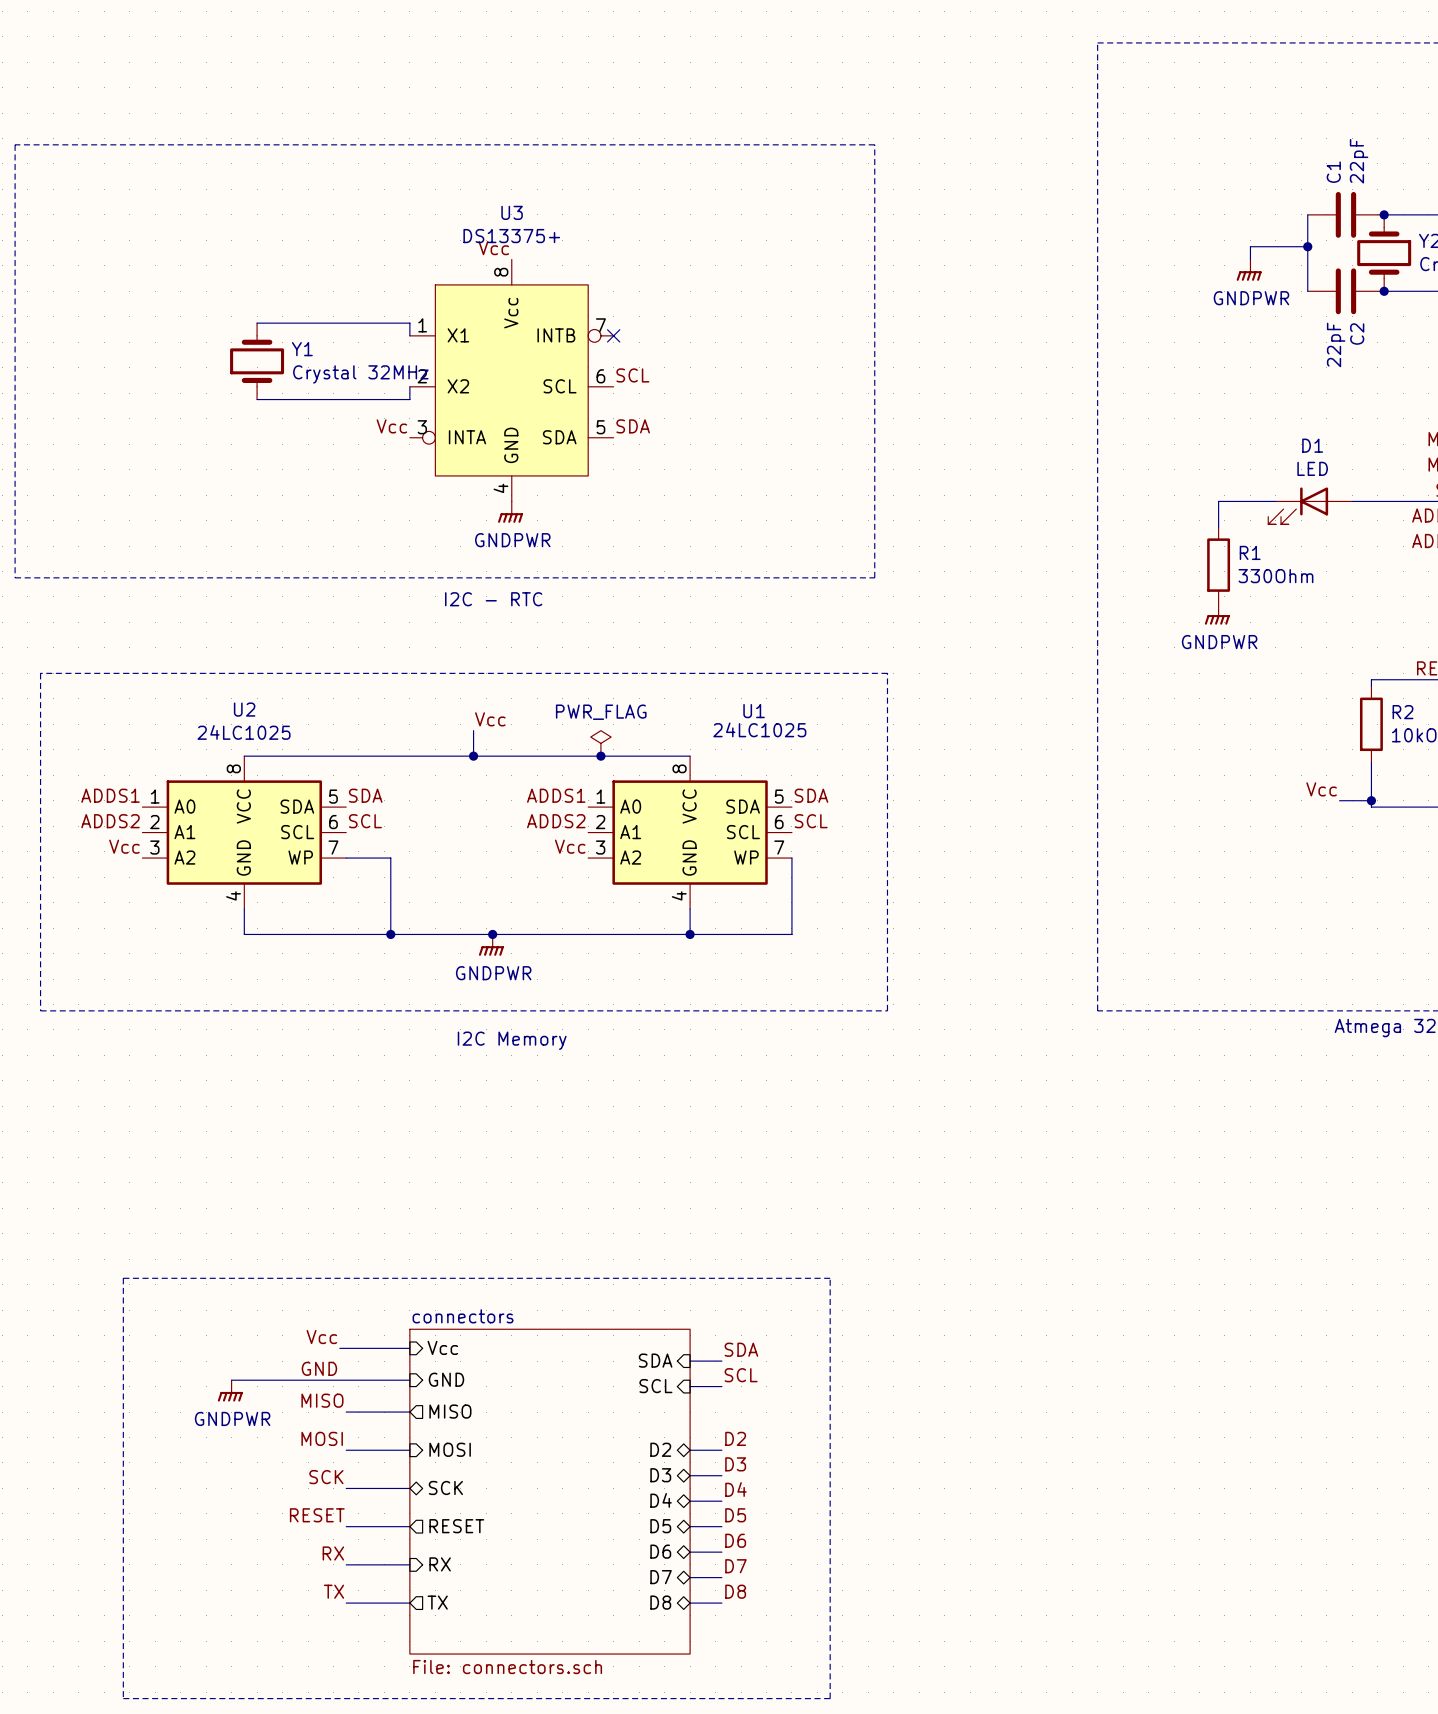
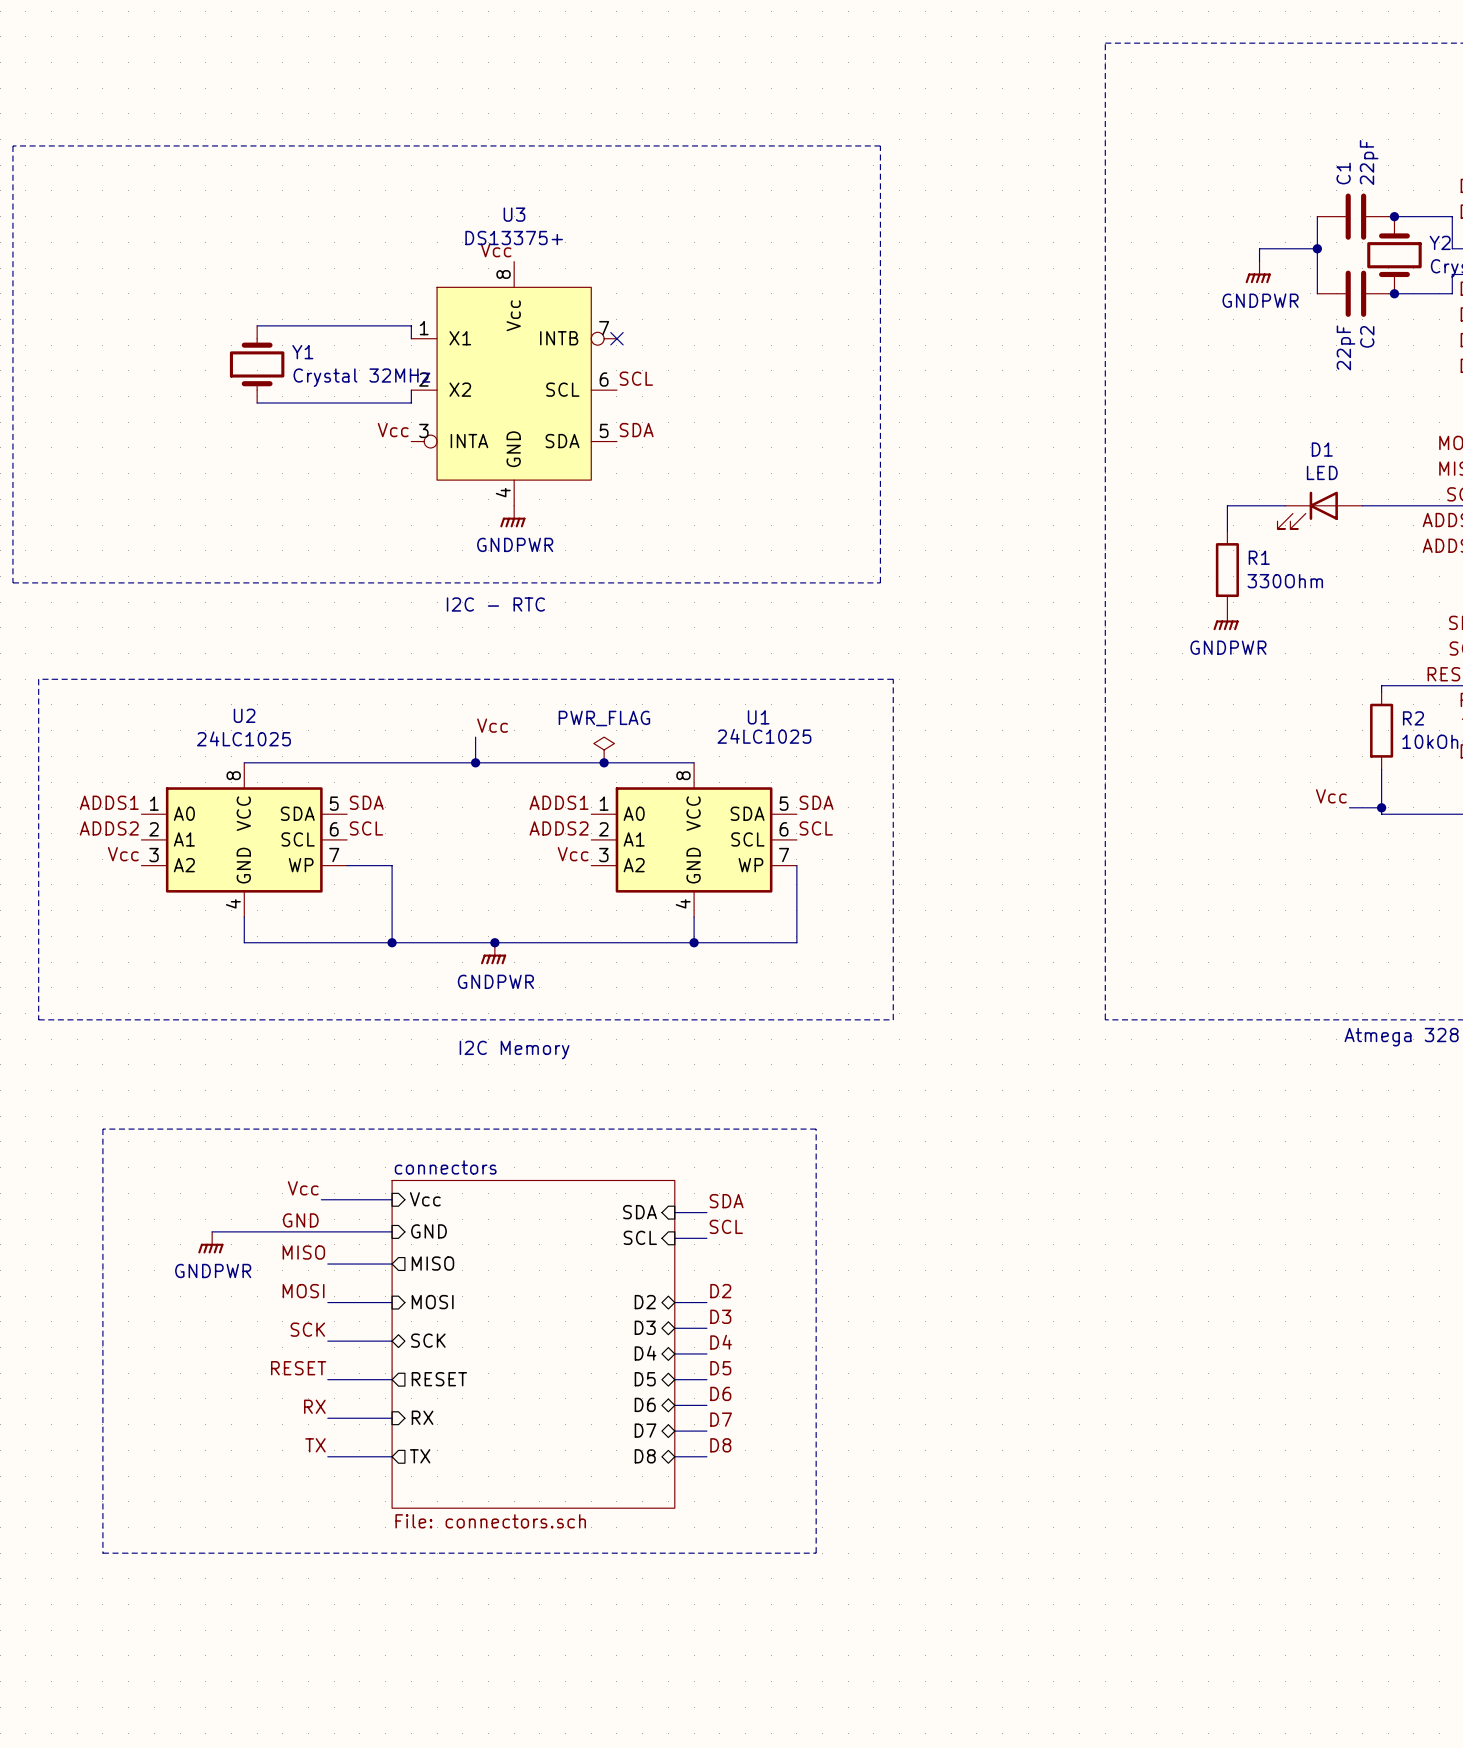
line: (123, 1278) (123, 1698) (830, 1698) (830, 1278) (123, 1278) -> (102, 1129) (102, 1553) (816, 1553) (816, 1129) (102, 1129)
label position: Vcc (321, 1336) -> Vcc (303, 1188)
sheet pin position: Vcc (442, 1347) -> Vcc (425, 1199)
wire: (339, 1348) (409, 1348) -> (321, 1199) (392, 1199)
label position: SDA (741, 1349) -> SDA (726, 1201)
sheet pin position: SDA (655, 1360) -> SDA (640, 1212)
wire: (690, 1361) (721, 1361) -> (674, 1212) (706, 1212)
label position: GND (319, 1368) -> GND (300, 1220)
label position: SCL (741, 1375) -> SCL (726, 1226)
sheet pin position: GND (446, 1379) -> GND (428, 1231)
wire: (231, 1380) (409, 1380) -> (212, 1231) (392, 1231)
sheet pin position: SCL (655, 1386) -> SCL (640, 1237)
wire: (690, 1386) (721, 1386) -> (674, 1238) (706, 1238)
power symbol position: GNDPWR (230, 1390) -> GNDPWR (210, 1242)
label position: MISO (322, 1400) -> MISO (303, 1252)
sheet pin position: MISO (450, 1411) -> MISO (432, 1263)
wire: (346, 1412) (409, 1412) -> (327, 1264) (392, 1264)
label position: MOSI (322, 1438) -> MOSI (303, 1291)
label position: D2 (735, 1438) -> D2 (720, 1291)
sheet pin position: MOSI (450, 1449) -> MOSI (432, 1302)
sheet pin position: D2 (660, 1449) -> D2 (645, 1302)
wire: (346, 1450) (409, 1450) -> (327, 1302) (392, 1302)
wire: (690, 1450) (721, 1450) -> (674, 1302) (706, 1302)
label position: D3 (735, 1464) -> D3 (720, 1316)
sheet pin position: D3 (660, 1475) -> D3 (645, 1327)
wire: (690, 1475) (721, 1475) -> (674, 1328) (706, 1328)
label position: SCK (326, 1477) -> SCK (307, 1329)
sheet pin position: SCK (445, 1487) -> SCK (428, 1340)
wire: (346, 1488) (409, 1488) -> (327, 1341) (392, 1341)
label position: D4 (735, 1489) -> D4 (721, 1342)
sheet connectors position: (549, 1491) -> (533, 1344)
sheet pin position: D4 (661, 1500) -> D4 (645, 1353)
wire: (690, 1501) (721, 1501) -> (674, 1353) (706, 1353)
label position: RESET (317, 1515) -> RESET (298, 1368)
label position: D5 (735, 1515) -> D5 (720, 1368)
wire: (346, 1526) (409, 1526) -> (327, 1379) (392, 1379)
sheet pin position: RESET (456, 1526) -> RESET (439, 1379)
sheet pin position: D5 (660, 1526) -> D5 (645, 1379)
wire: (690, 1526) (721, 1526) -> (674, 1379) (706, 1379)
label position: D6 (735, 1540) -> D6 (720, 1393)
sheet pin position: D6 (660, 1551) -> D6 (645, 1404)
wire: (690, 1552) (721, 1552) -> (674, 1405) (706, 1405)
label position: RX (333, 1553) -> RX (314, 1406)
wire: (346, 1564) (409, 1564) -> (327, 1418) (392, 1418)
sheet pin position: RX (440, 1564) -> RX (422, 1417)
label position: D7 (735, 1566) -> D7 (721, 1419)
sheet pin position: D7 (661, 1577) -> D7 (645, 1430)
wire: (690, 1577) (721, 1577) -> (674, 1431) (706, 1431)
label position: TX (333, 1591) -> TX (315, 1445)
label position: D8 (735, 1591) -> D8 (720, 1445)
sheet pin position: TX (437, 1602) -> TX (420, 1456)
sheet pin position: D8 (660, 1602) -> D8 (645, 1456)
wire: (346, 1603) (409, 1603) -> (327, 1456) (392, 1456)
wire: (690, 1603) (721, 1603) -> (674, 1456) (706, 1456)

